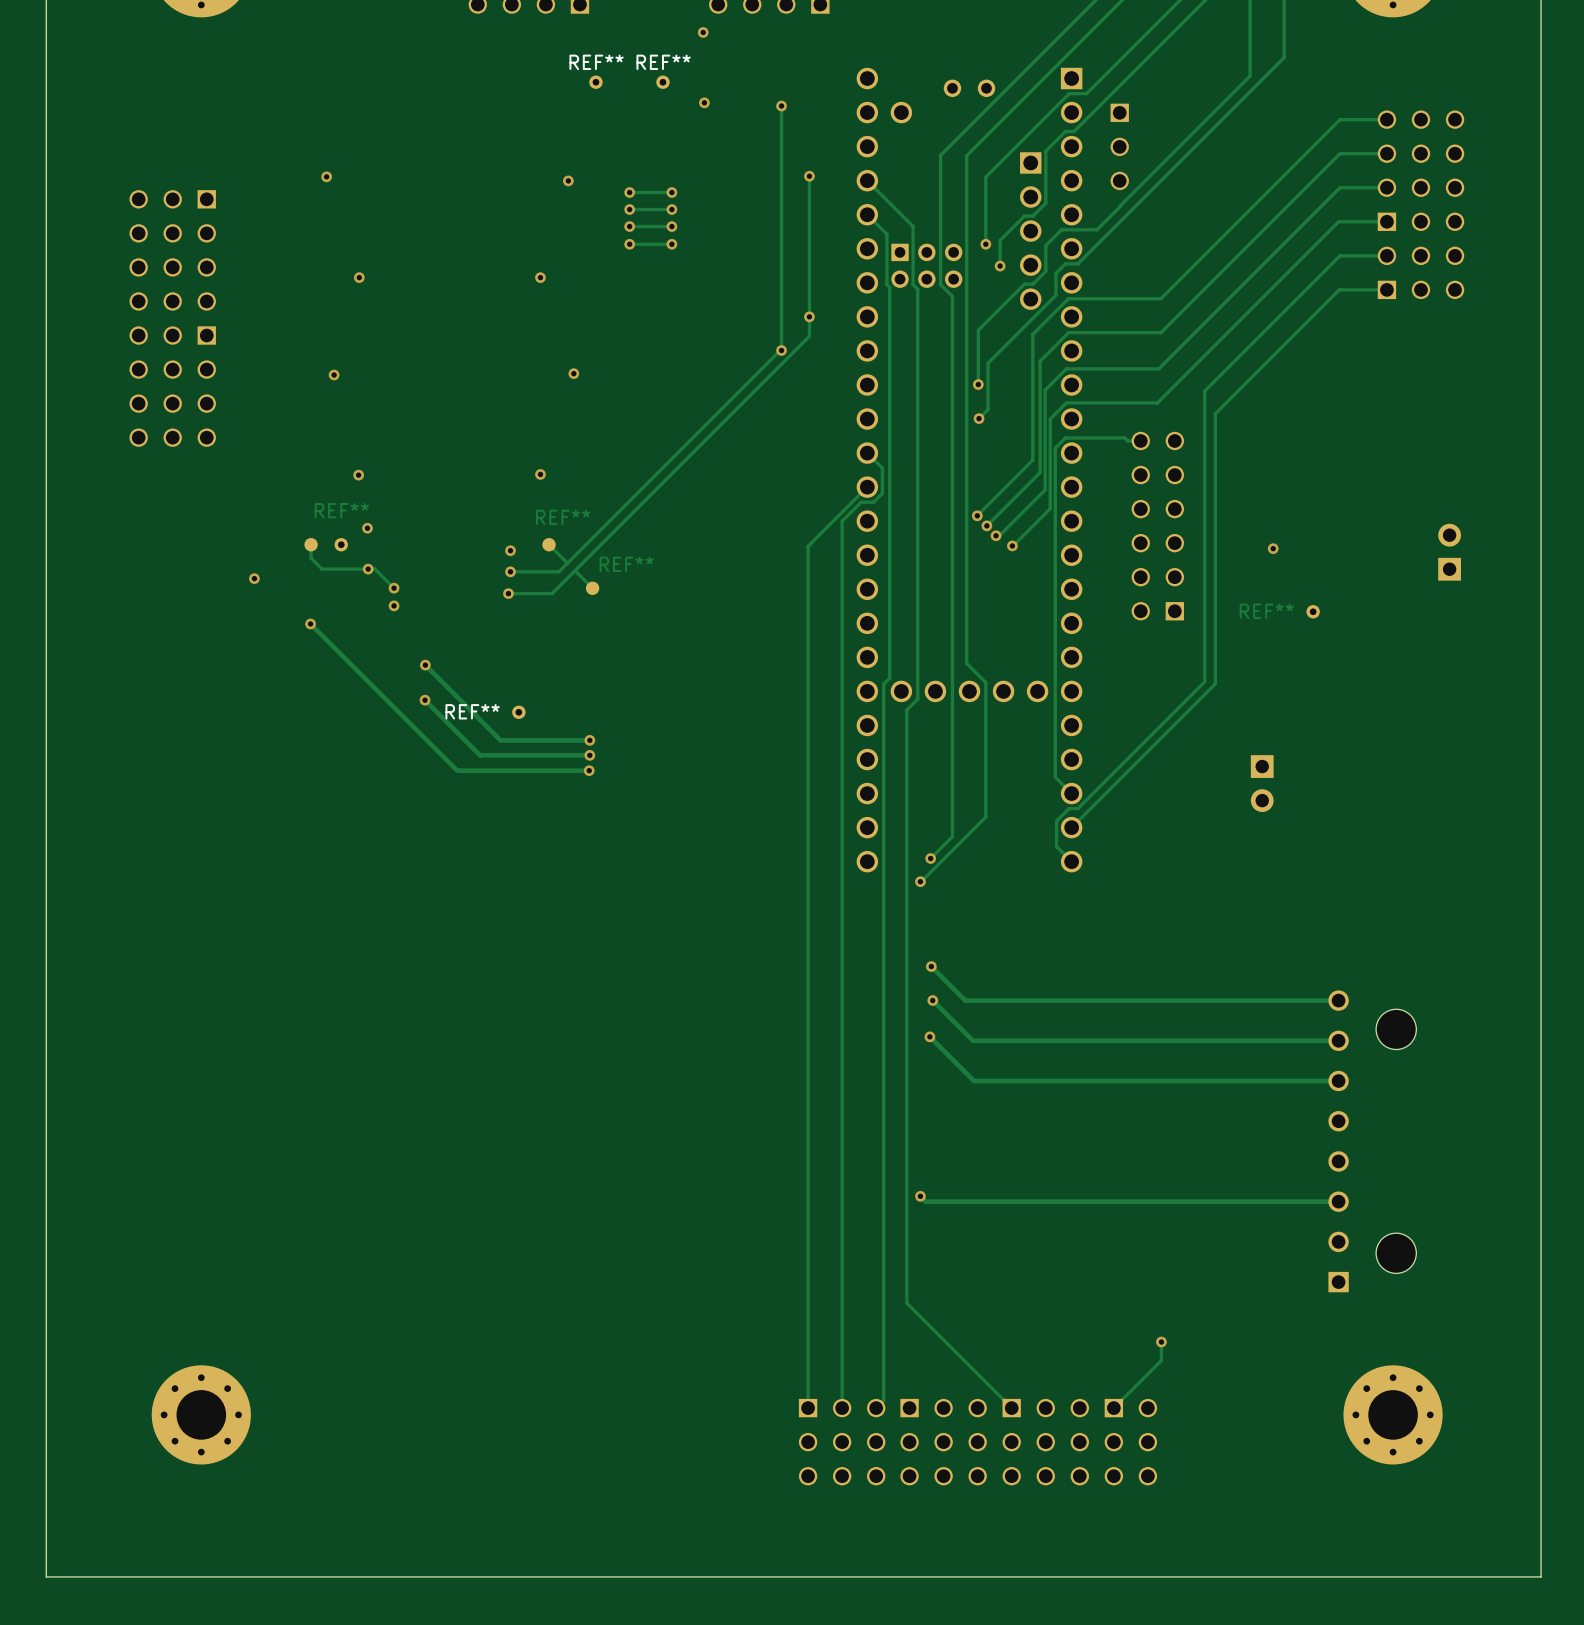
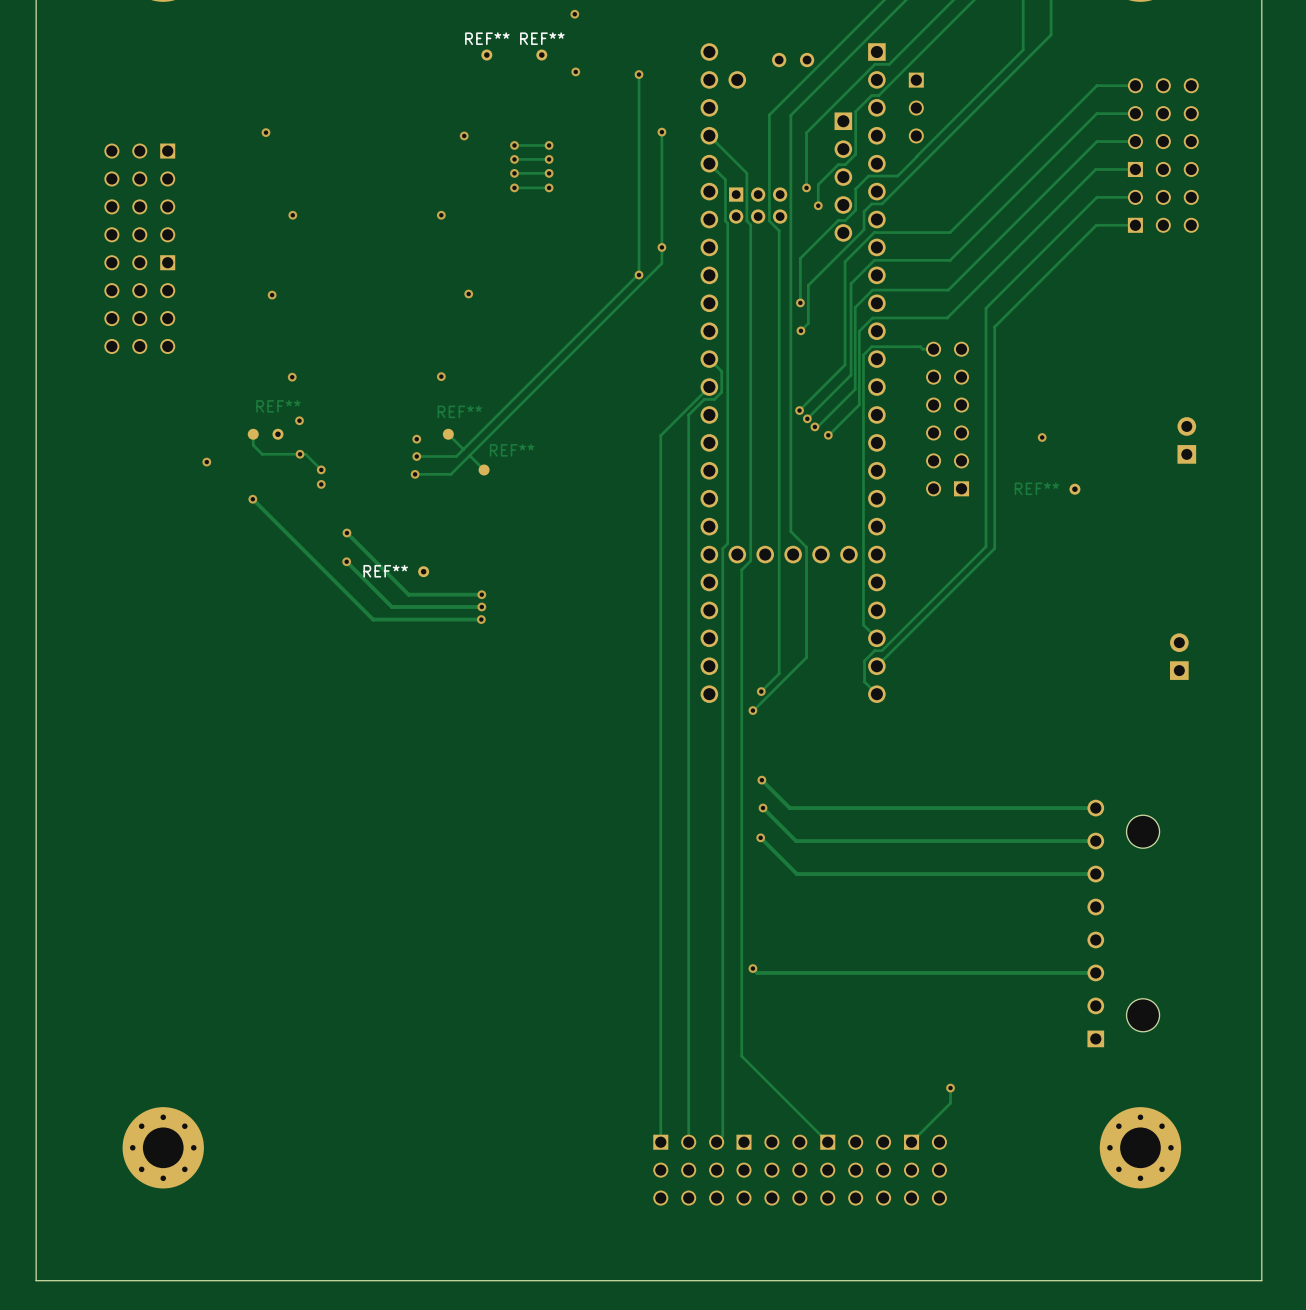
part rotation: 0° (1262, 783) -> 180° (1179, 656)
part position: (1262, 783) -> (1179, 656)

